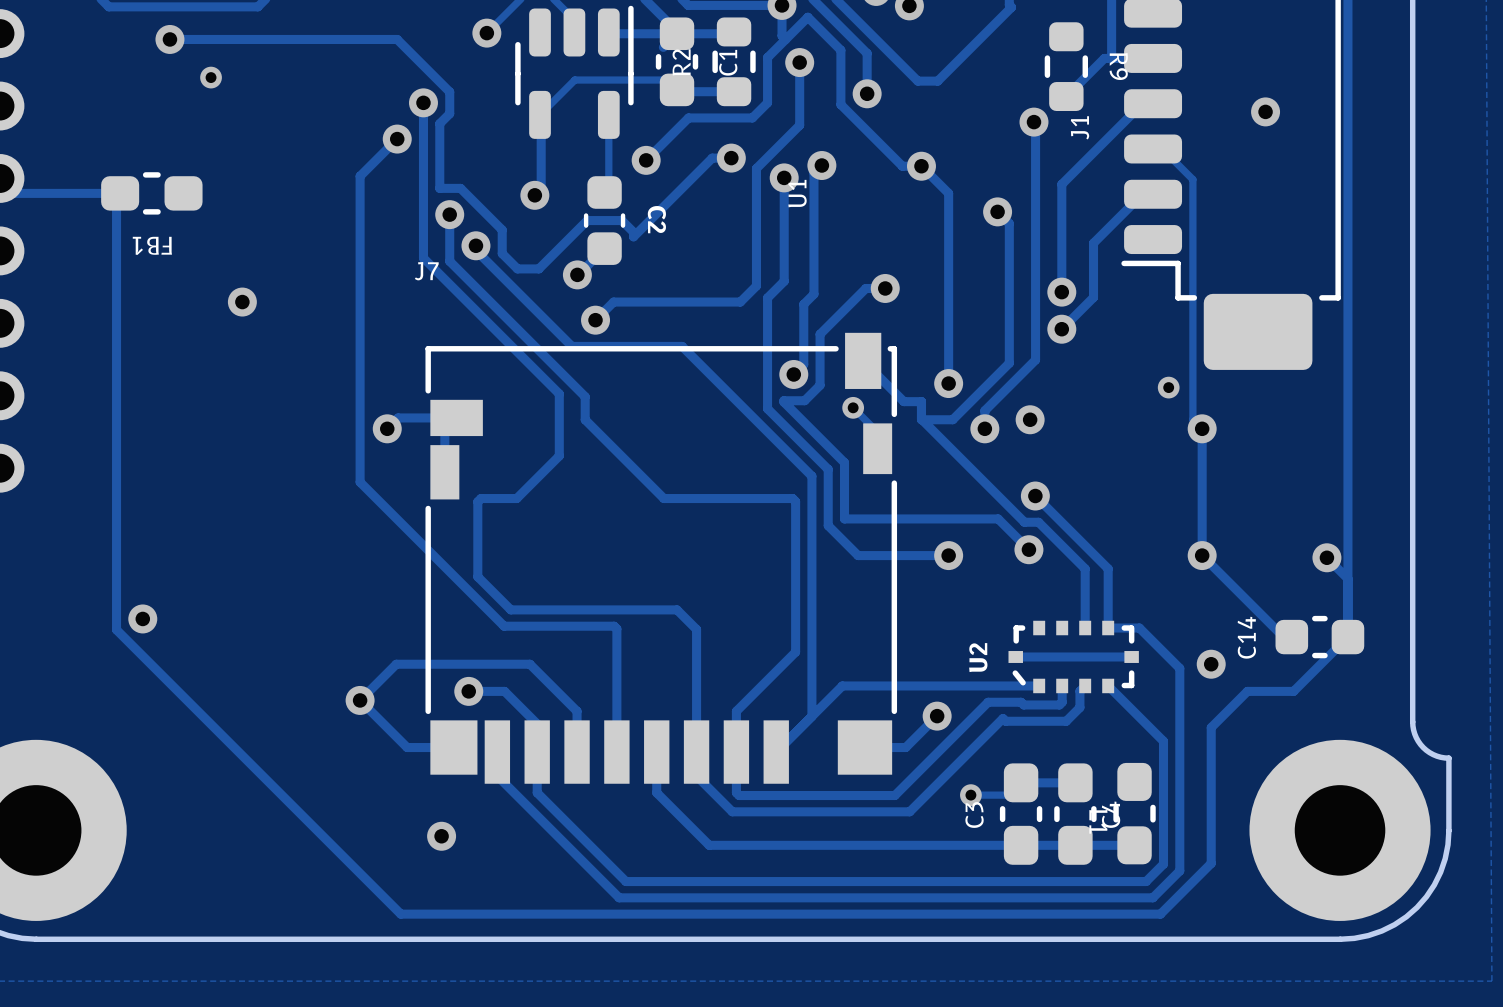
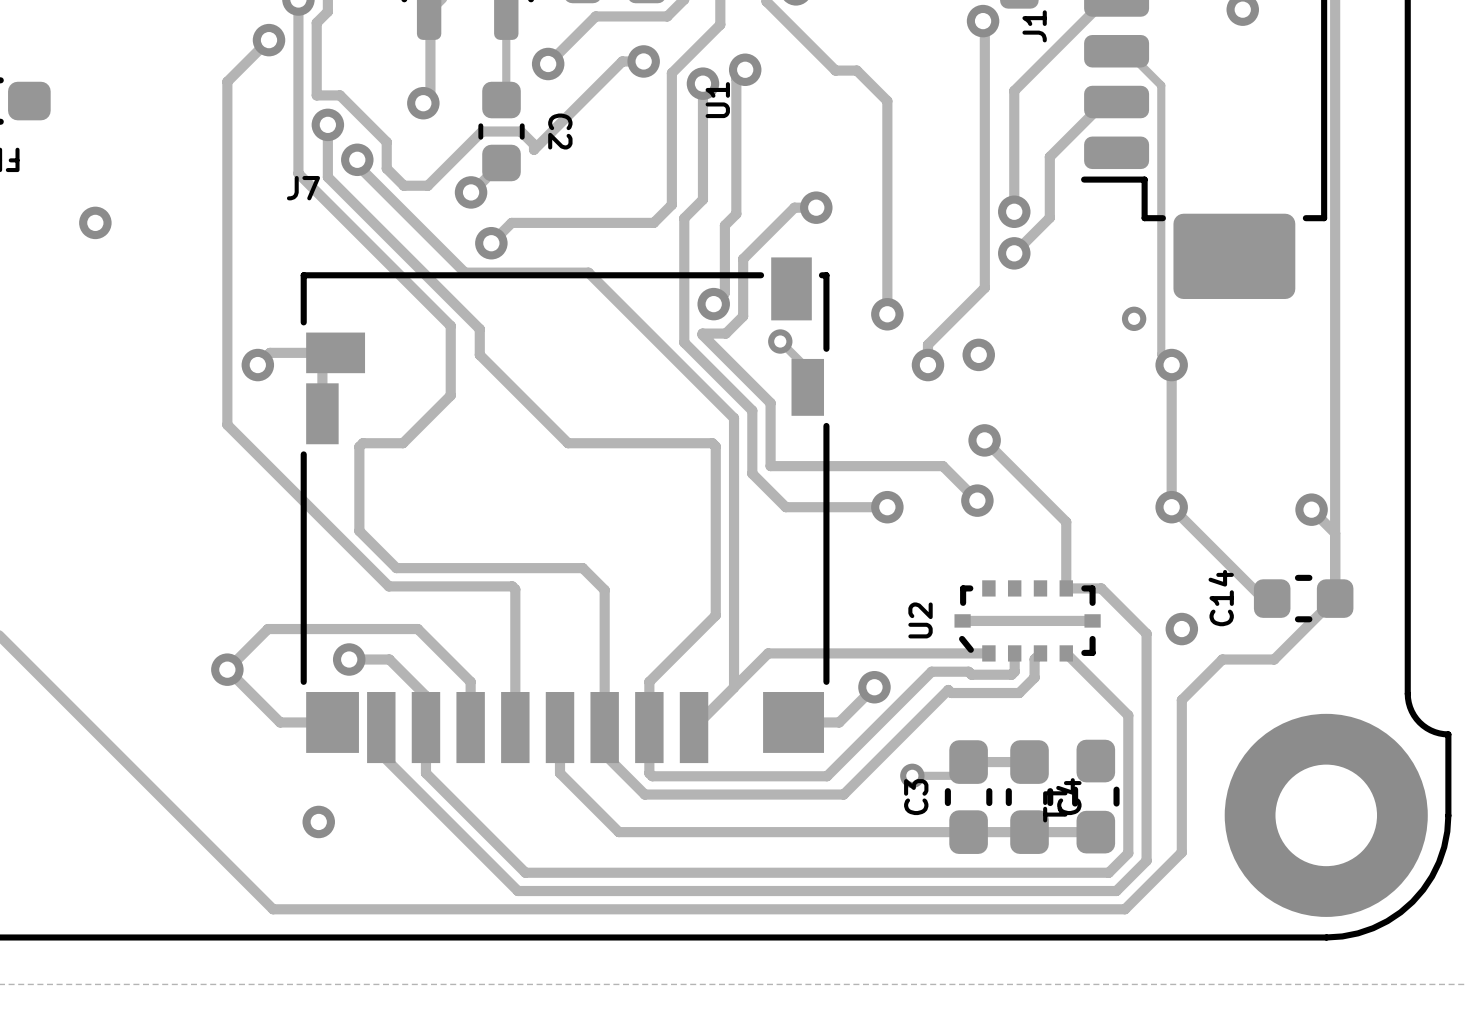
via: (921, 166) -> none
track: (997, 211) (1009, 223) (1009, 363) (952, 419) (921, 419) (921, 401) (903, 401) (863, 360) -> none
via: (997, 211) -> none
track: (921, 419) (1024, 522) (1038, 522) (1085, 568) (1085, 628) -> none

